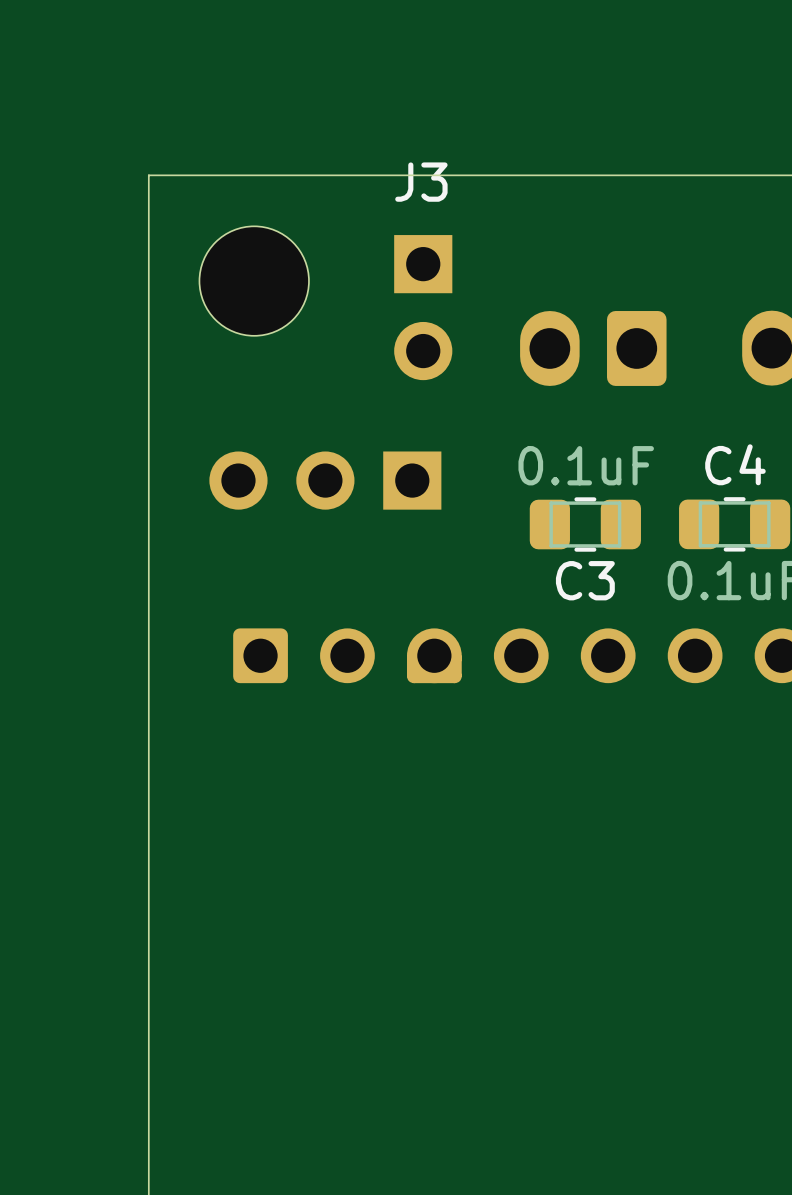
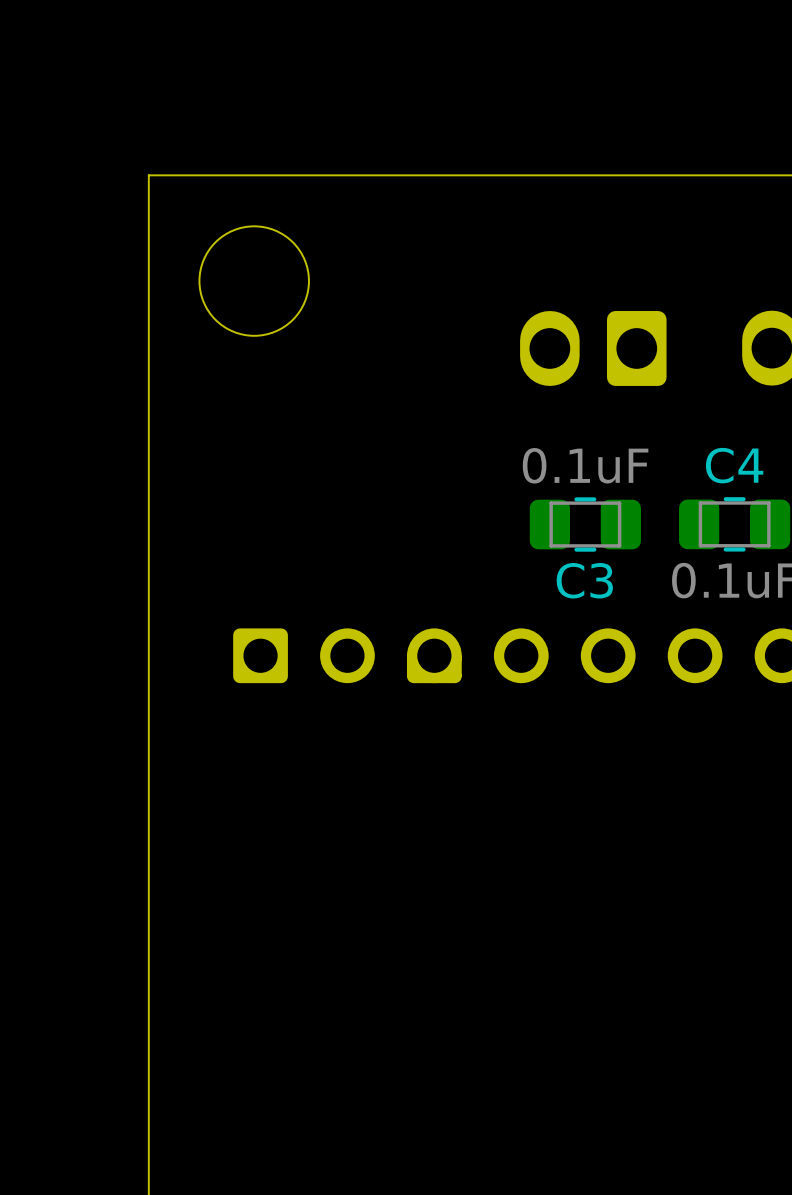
J3: (423, 307) -> none
part: (325, 480) -> none

